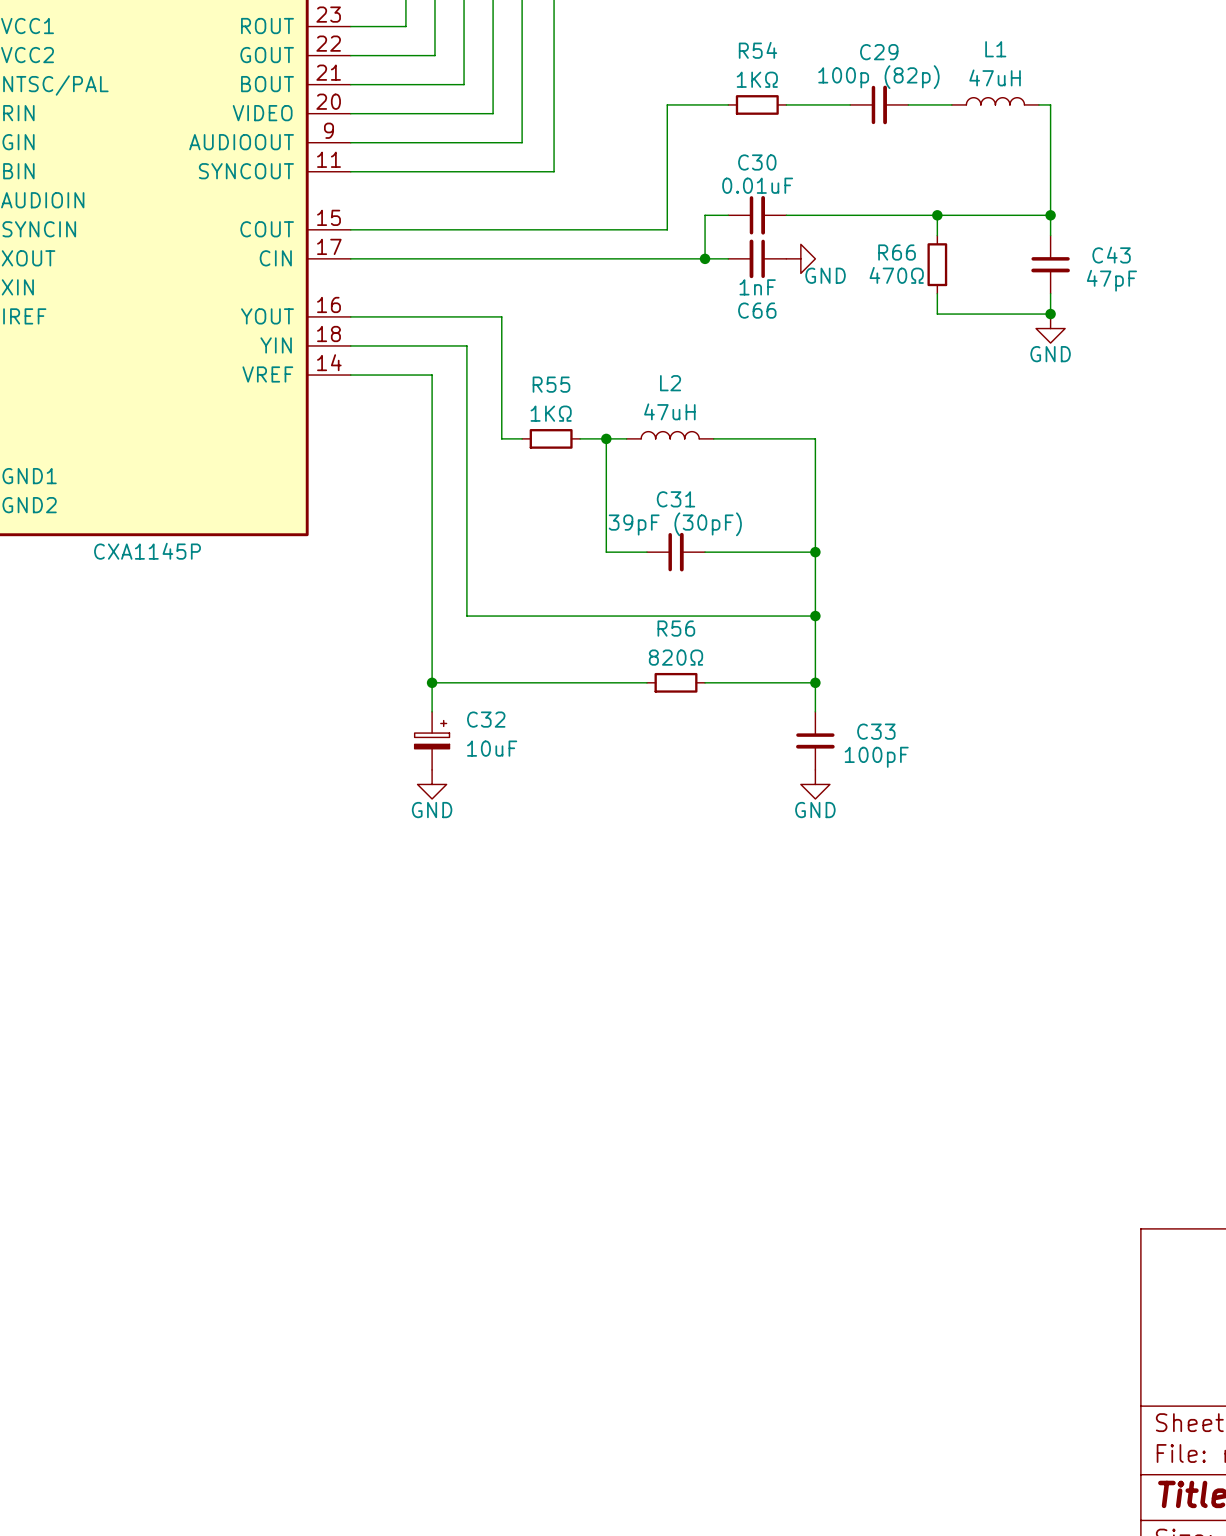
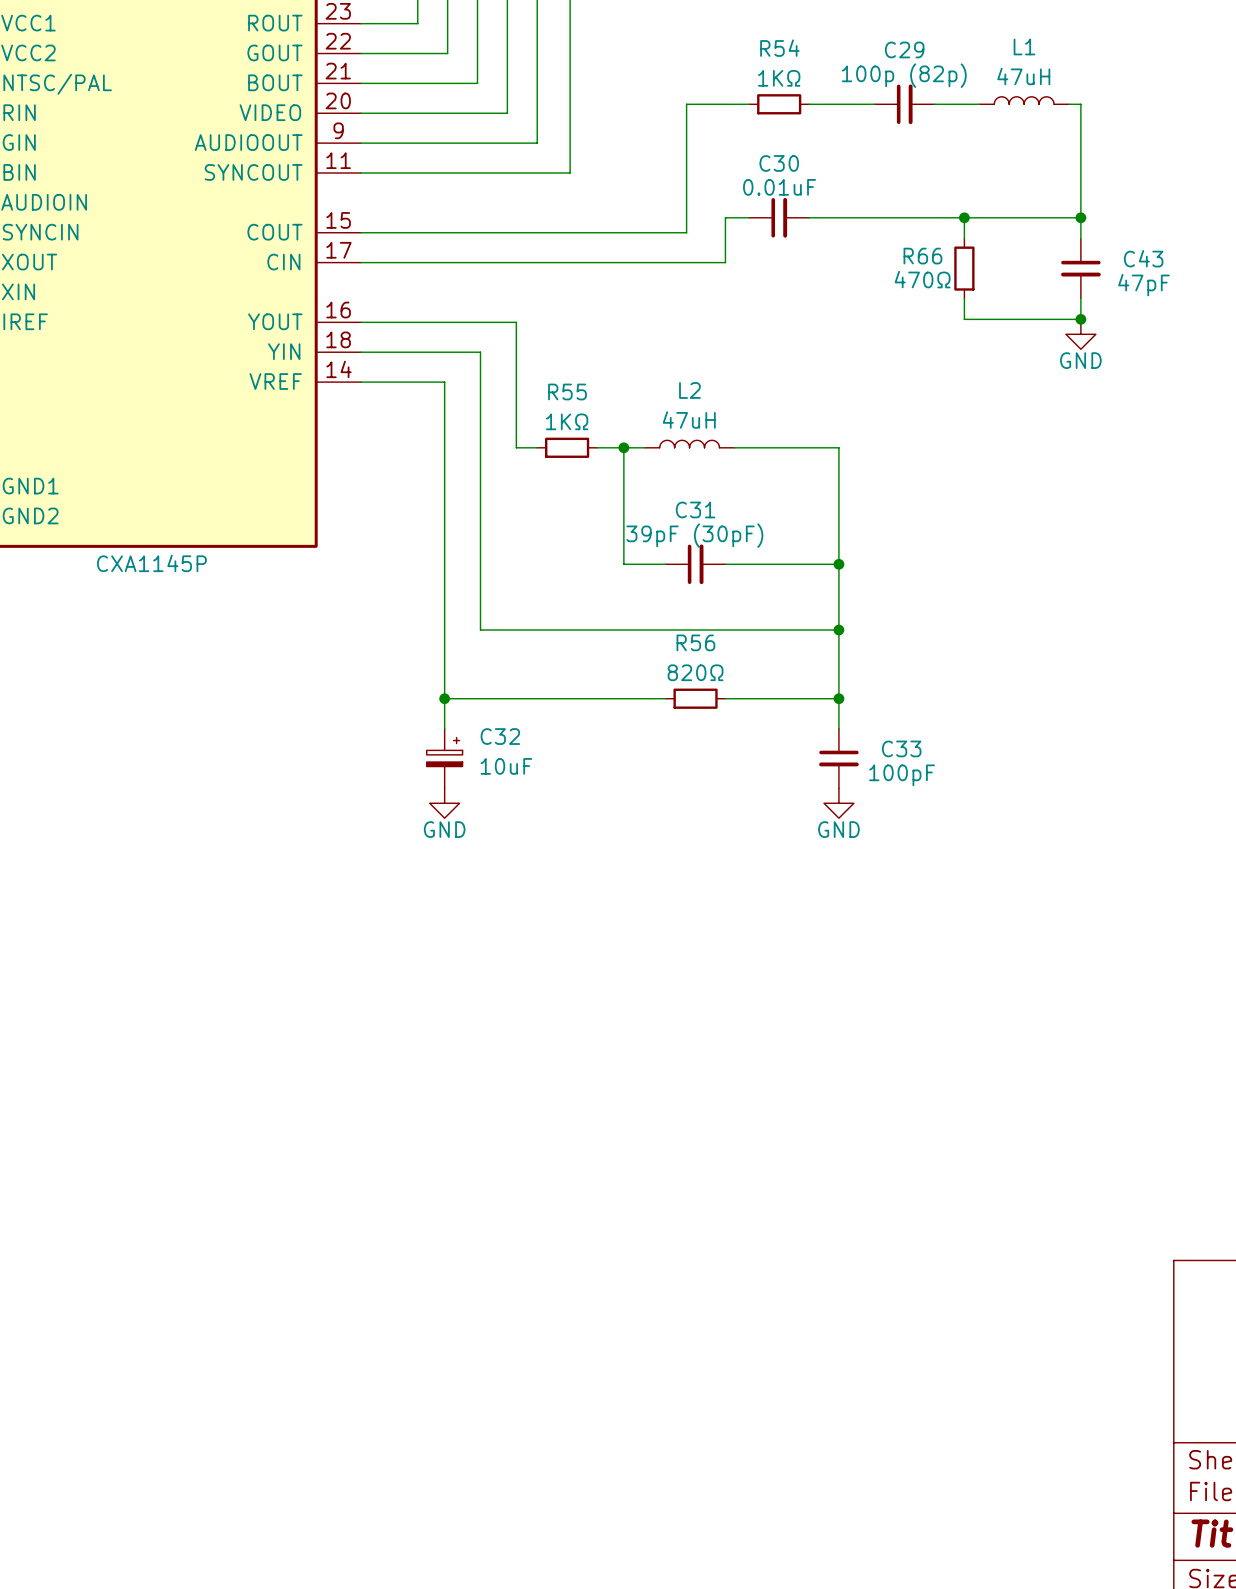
wire: (705, 258) (728, 258) -> none
junction: (705, 258) -> none
C66: 1nF (757, 258) -> none
power symbol: GND (800, 258) -> none

